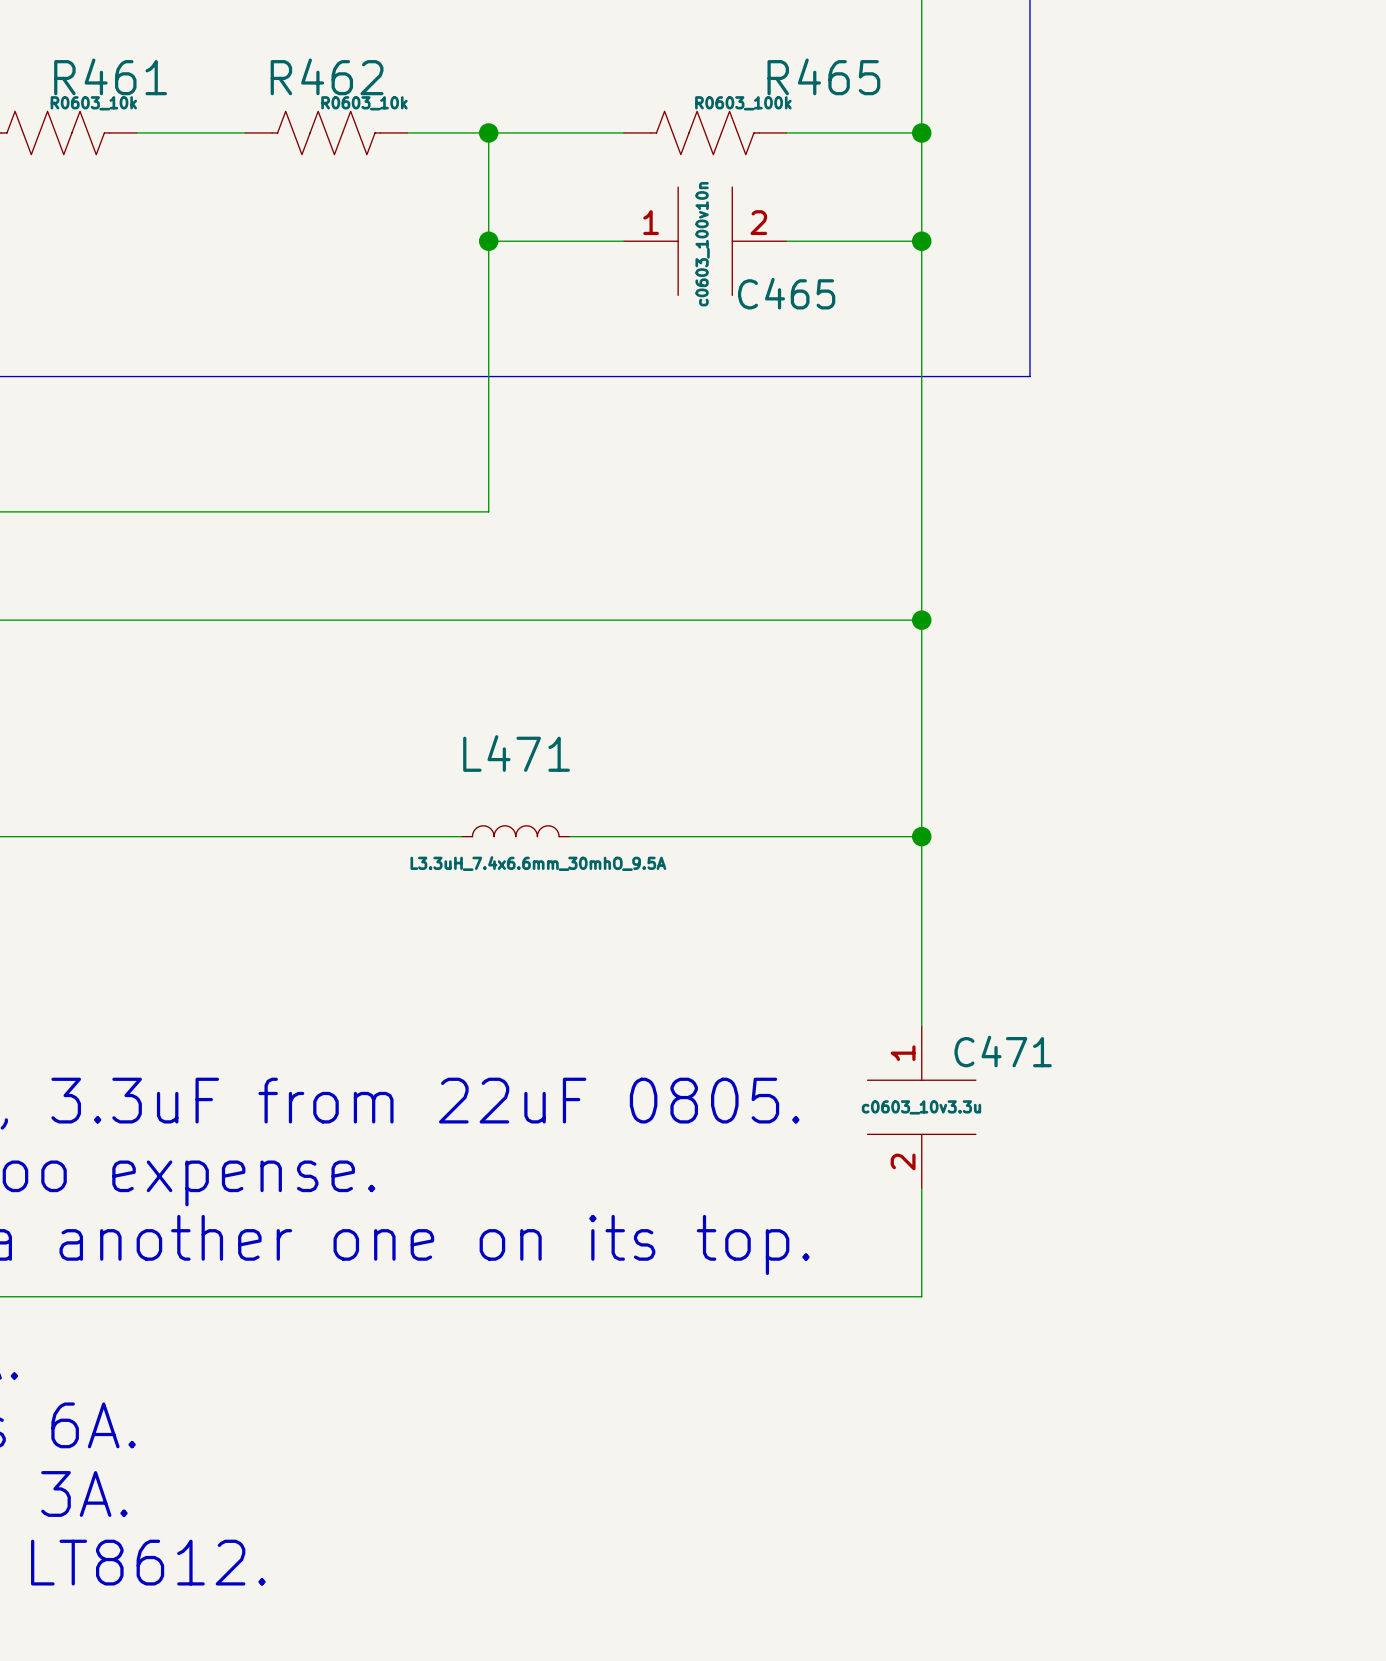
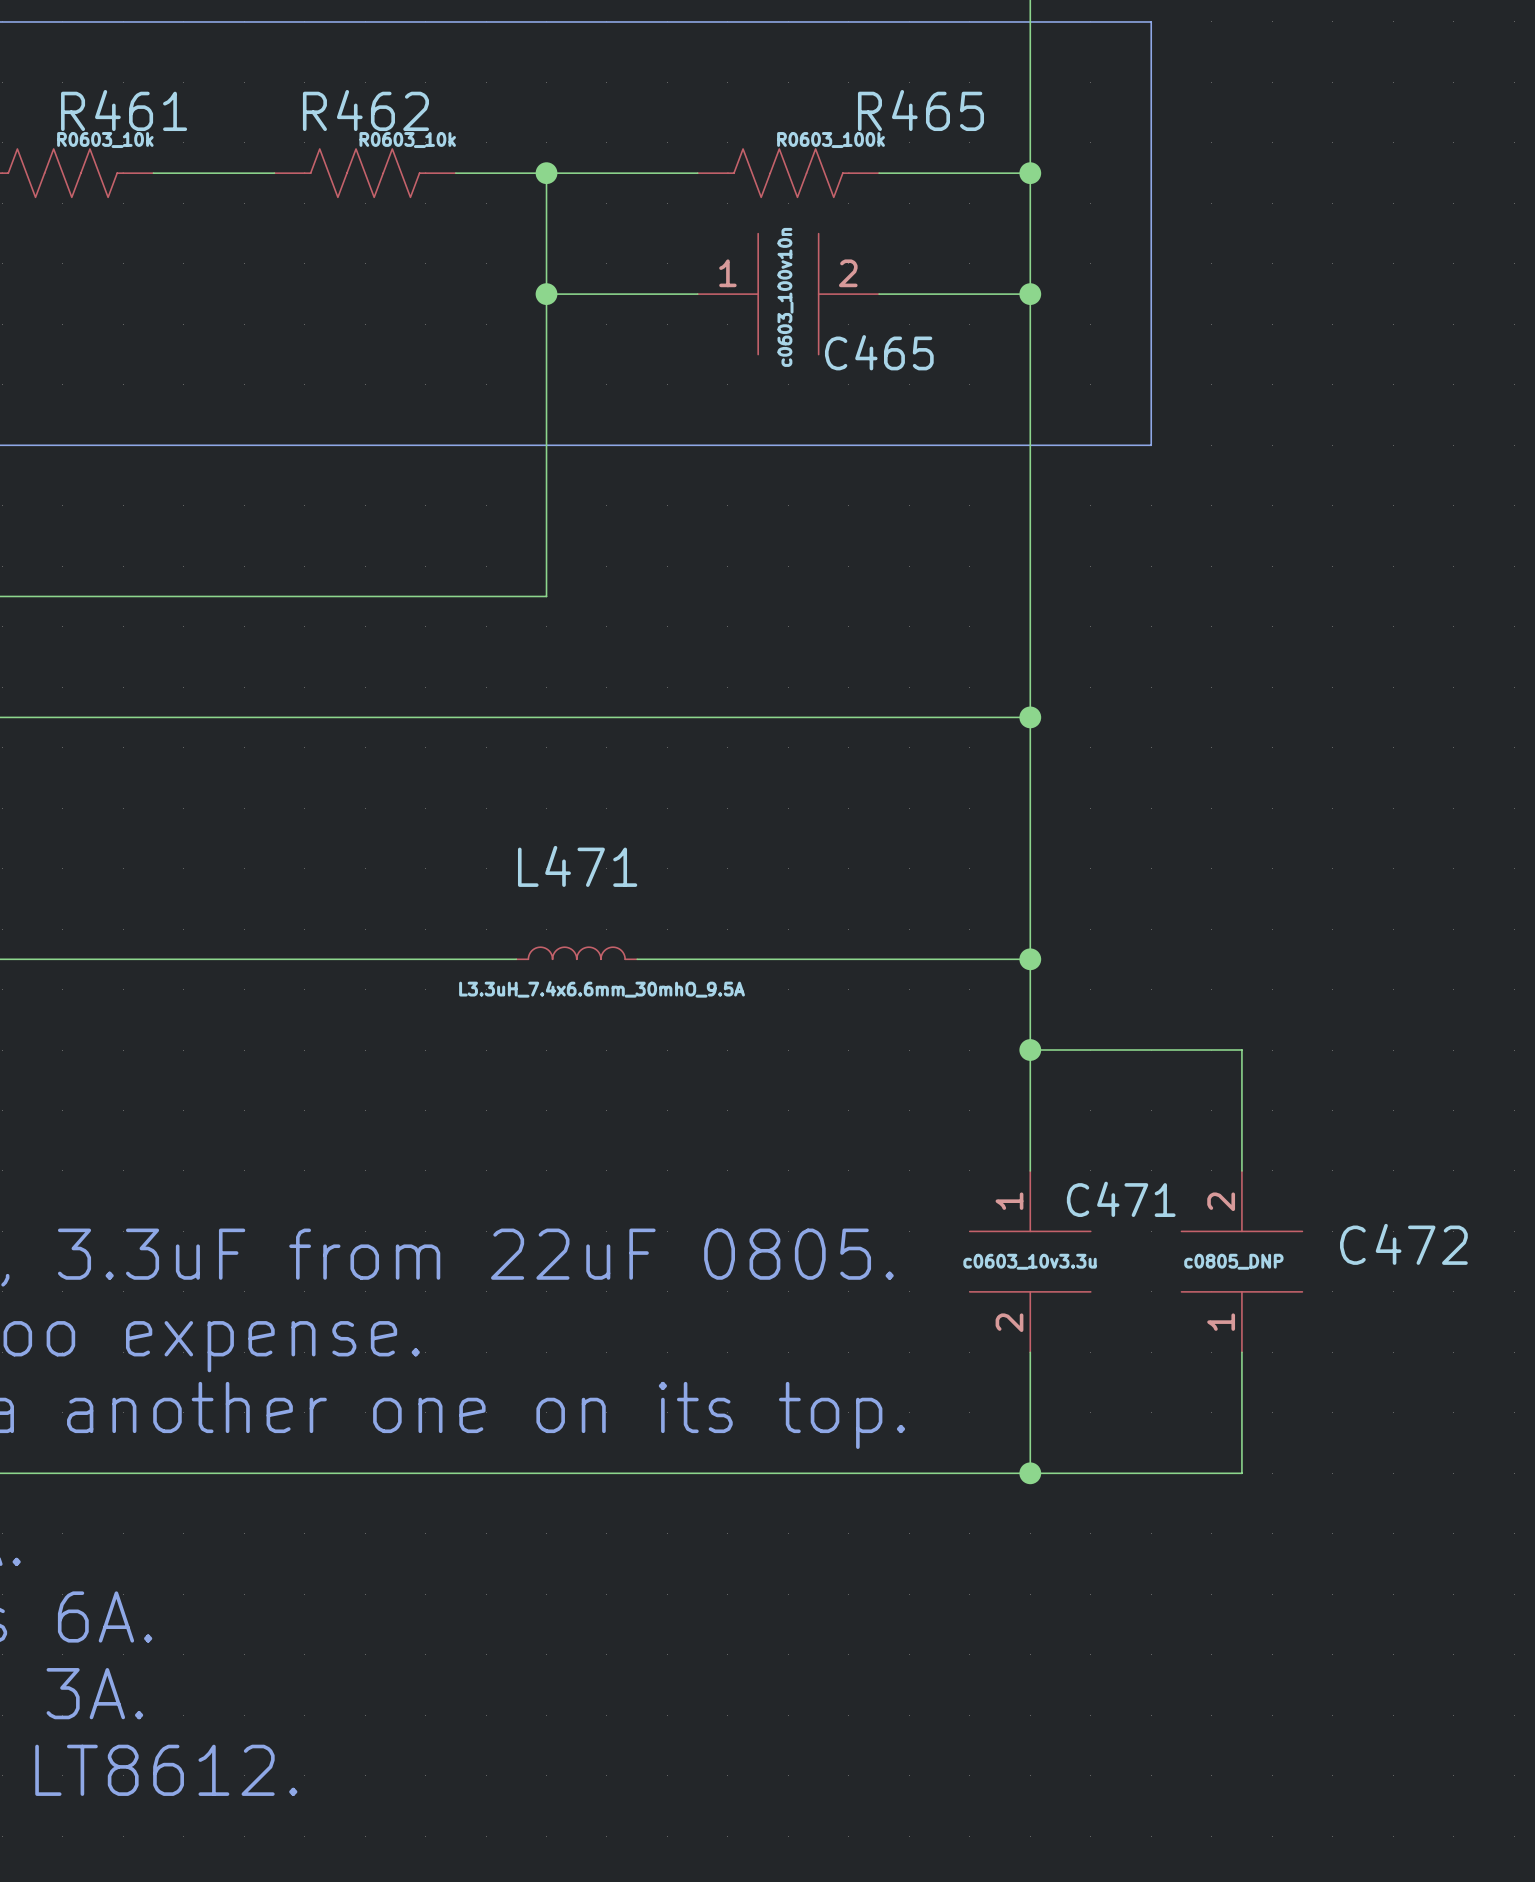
wire: none -> (1030, 1050) (1241, 1050) (1241, 1170)
junction: none -> (1030, 1050)
C472: none -> c0805_DNP (1241, 1261)
wire: none -> (1241, 1352) (1241, 1473) (1030, 1473)
junction: none -> (1030, 1473)

